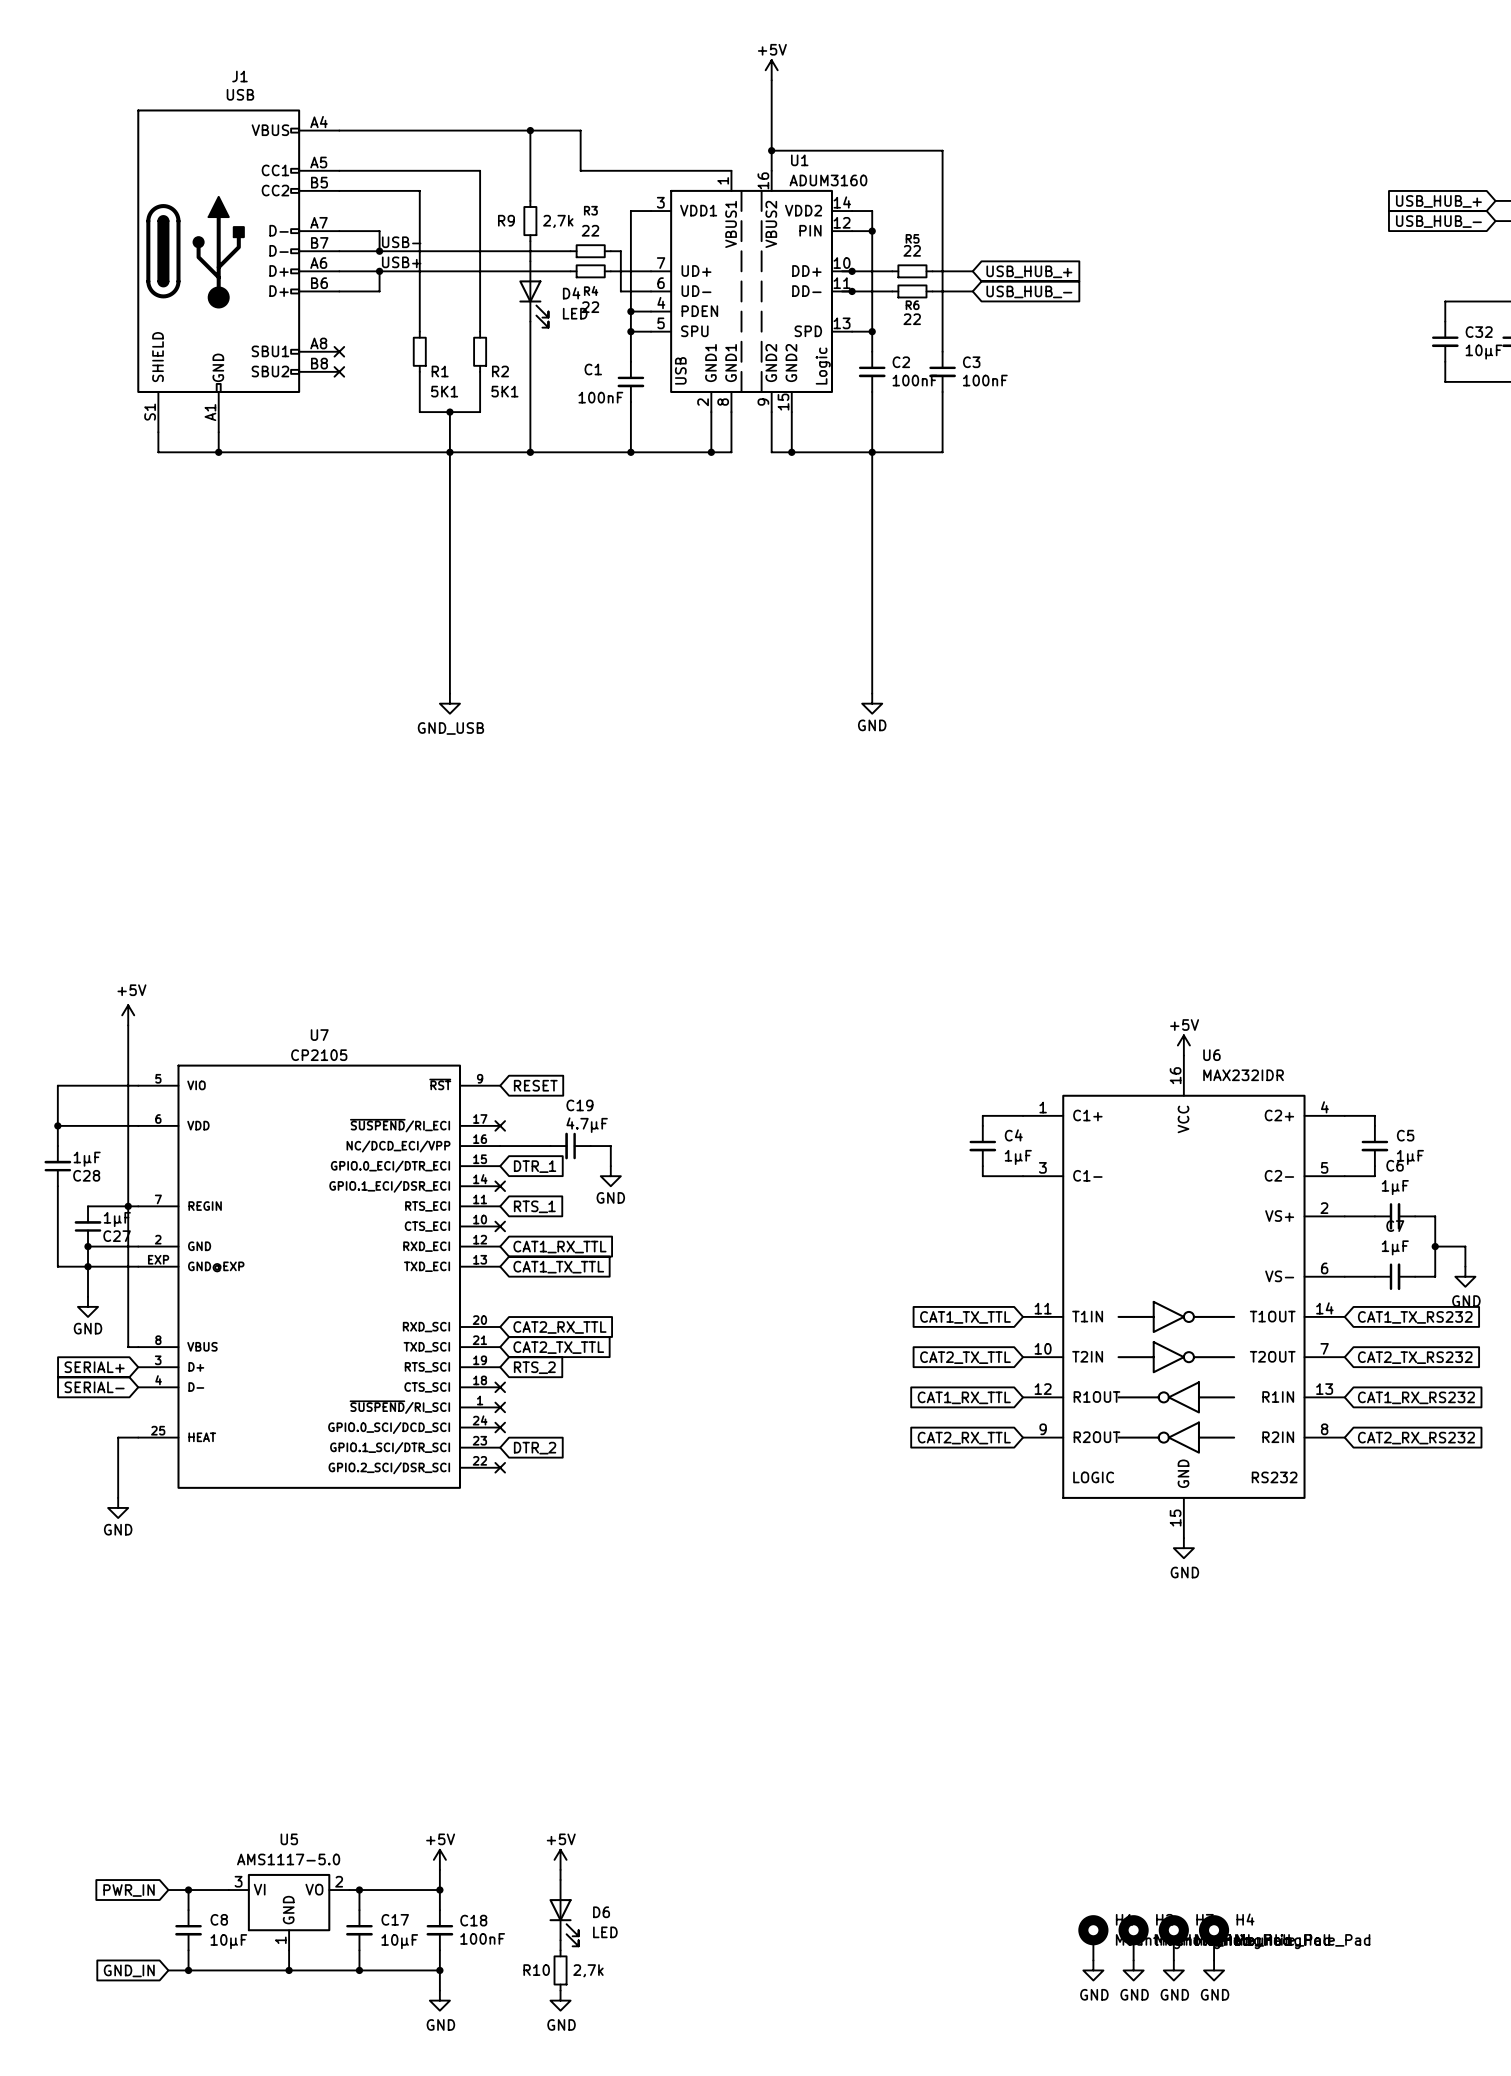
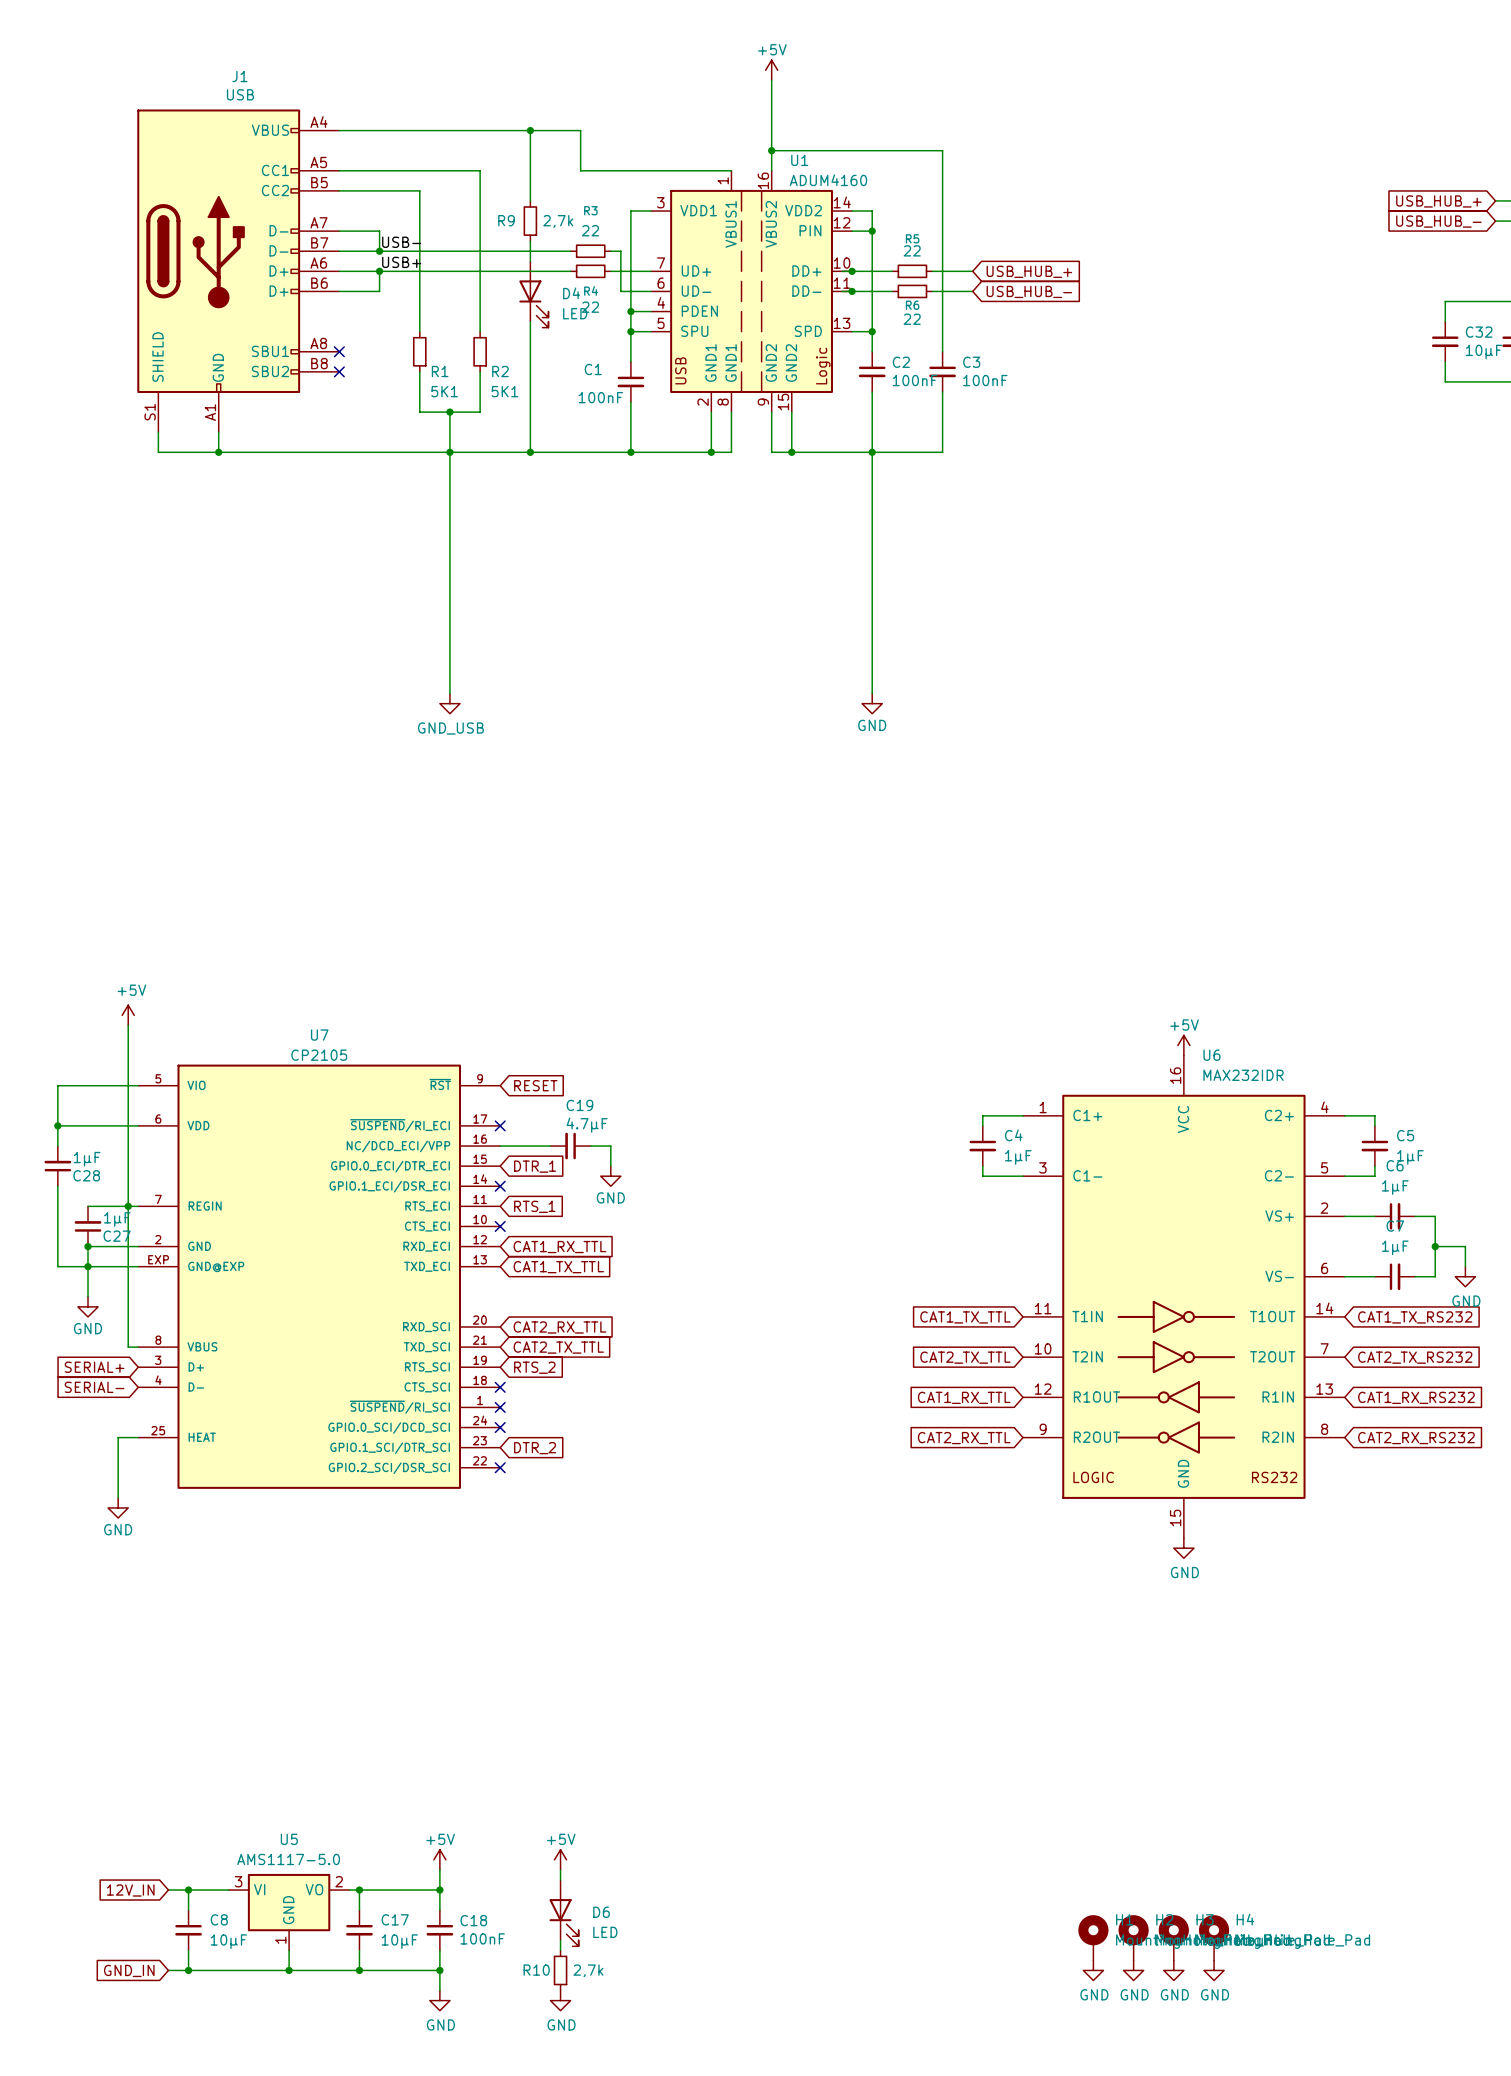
U1 value: ADUM3160 (828, 180) -> ADUM4160 (828, 180)
global label: PWR_IN (129, 1890) -> 12V_IN (130, 1890)

